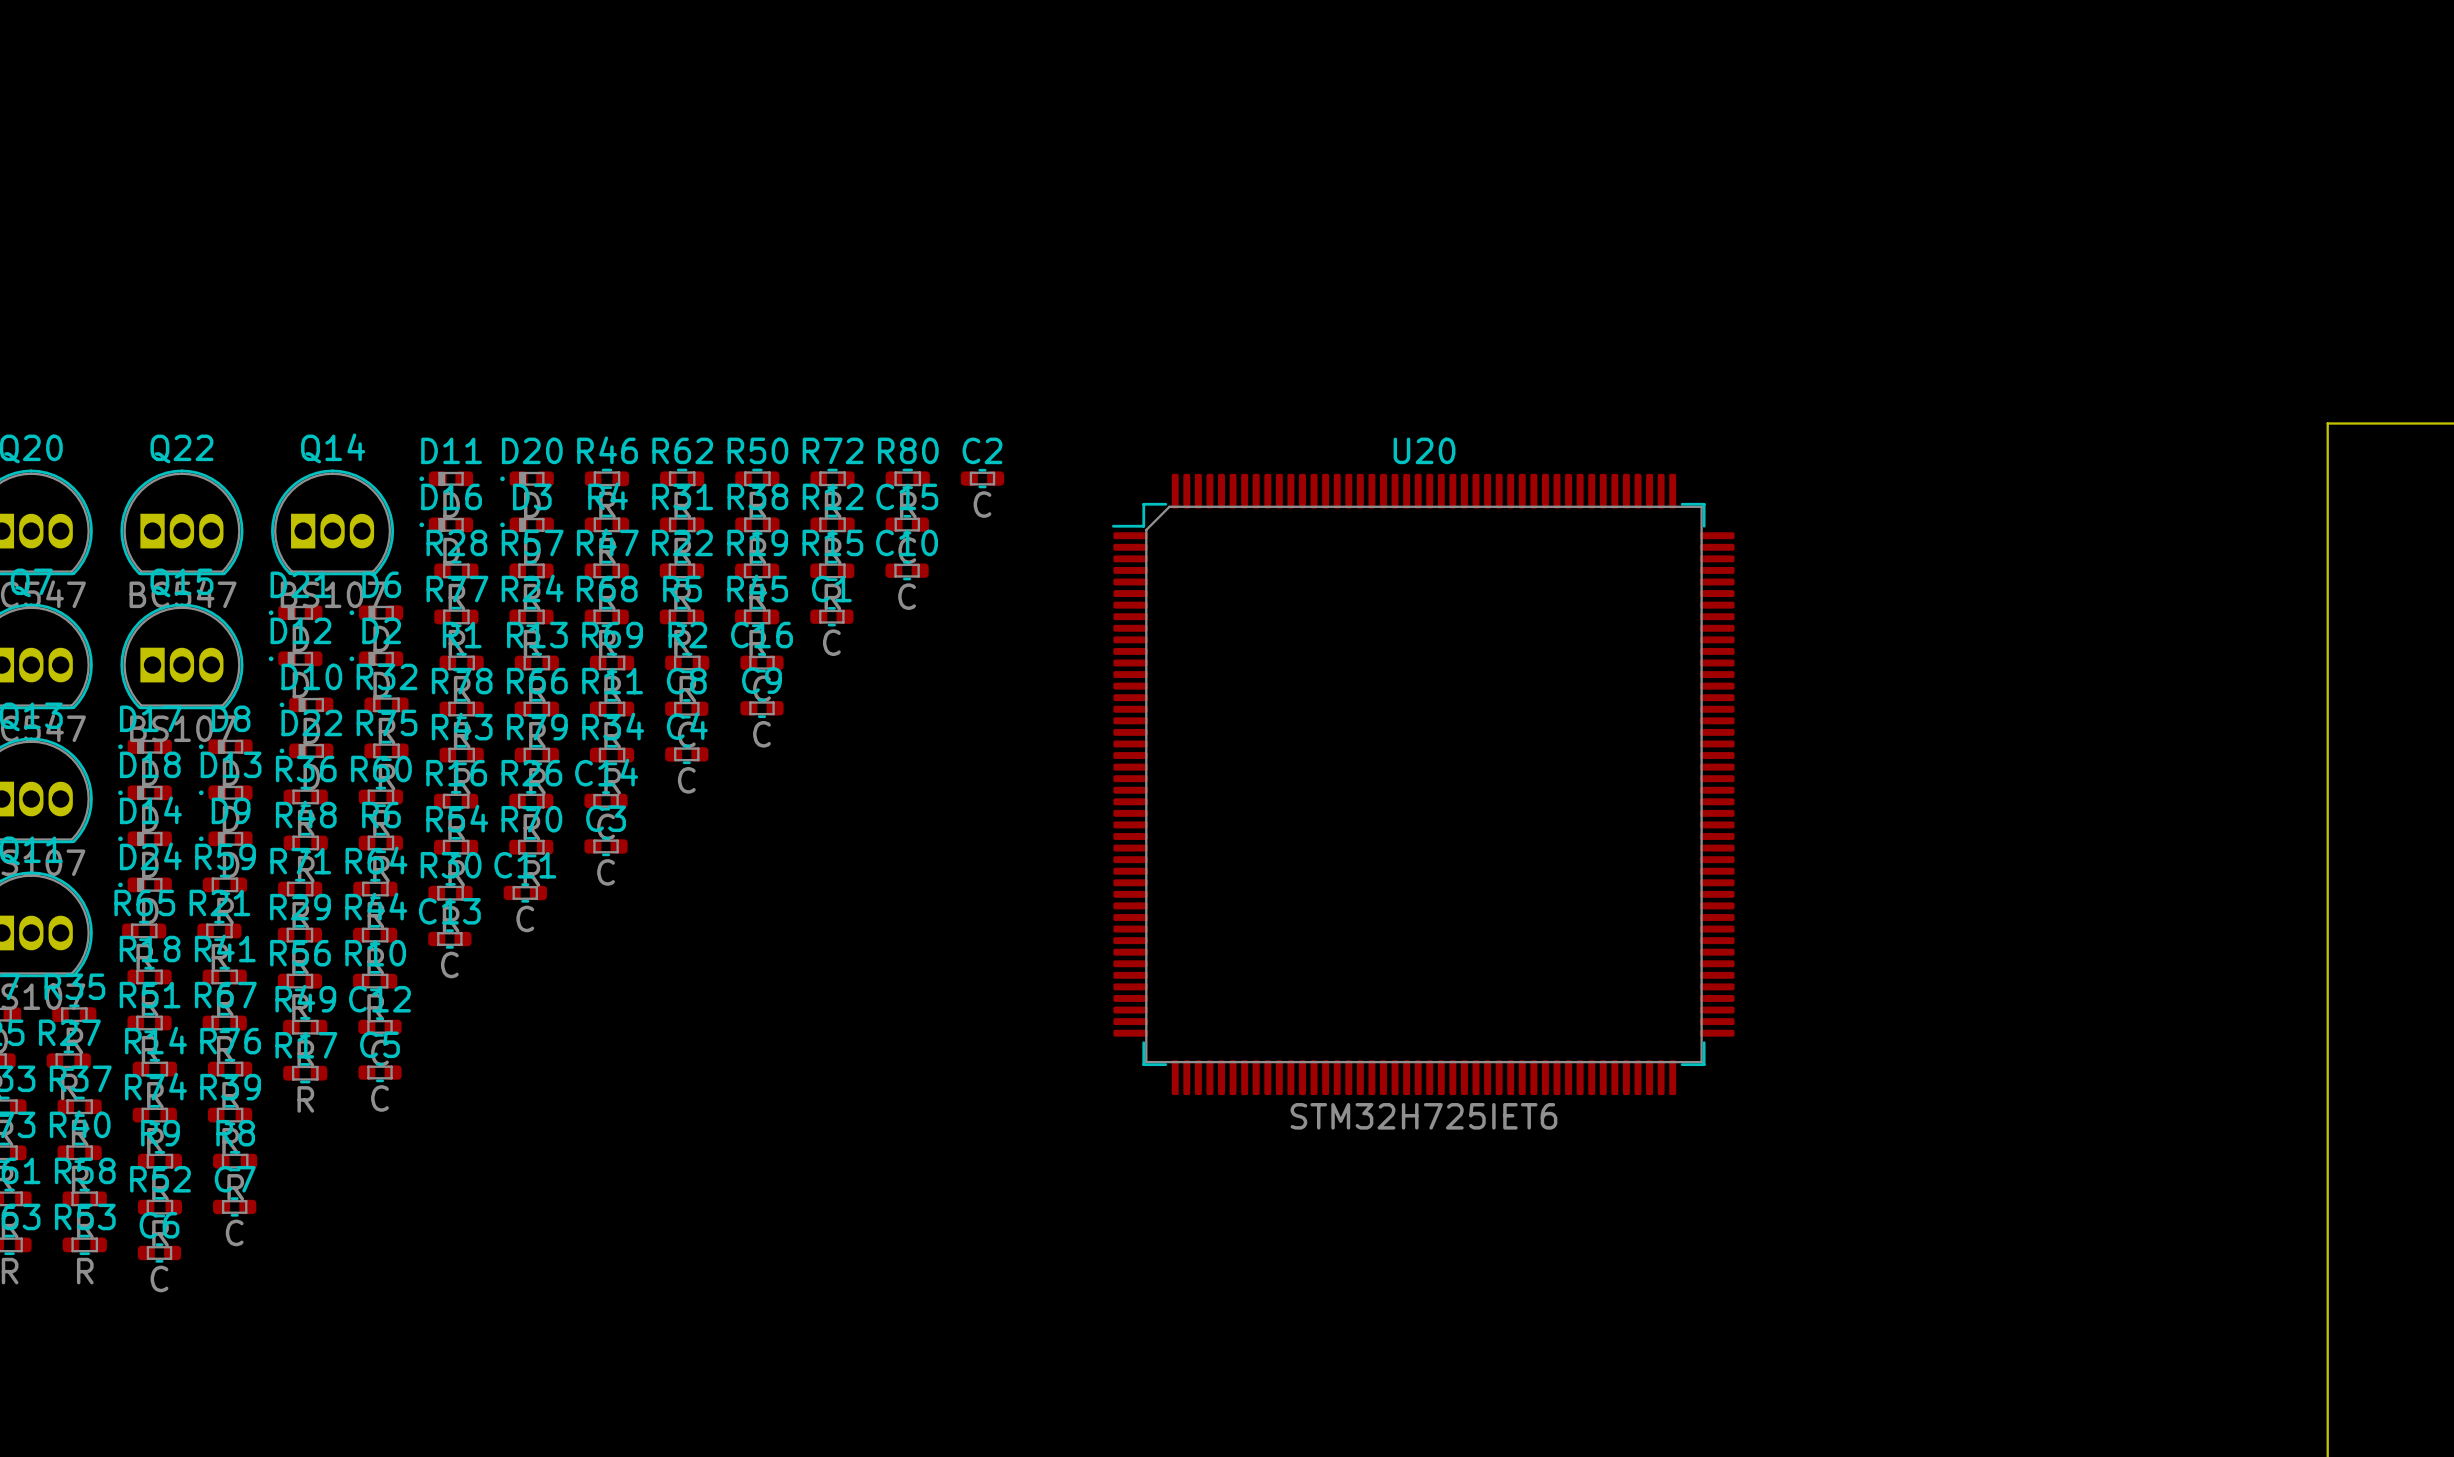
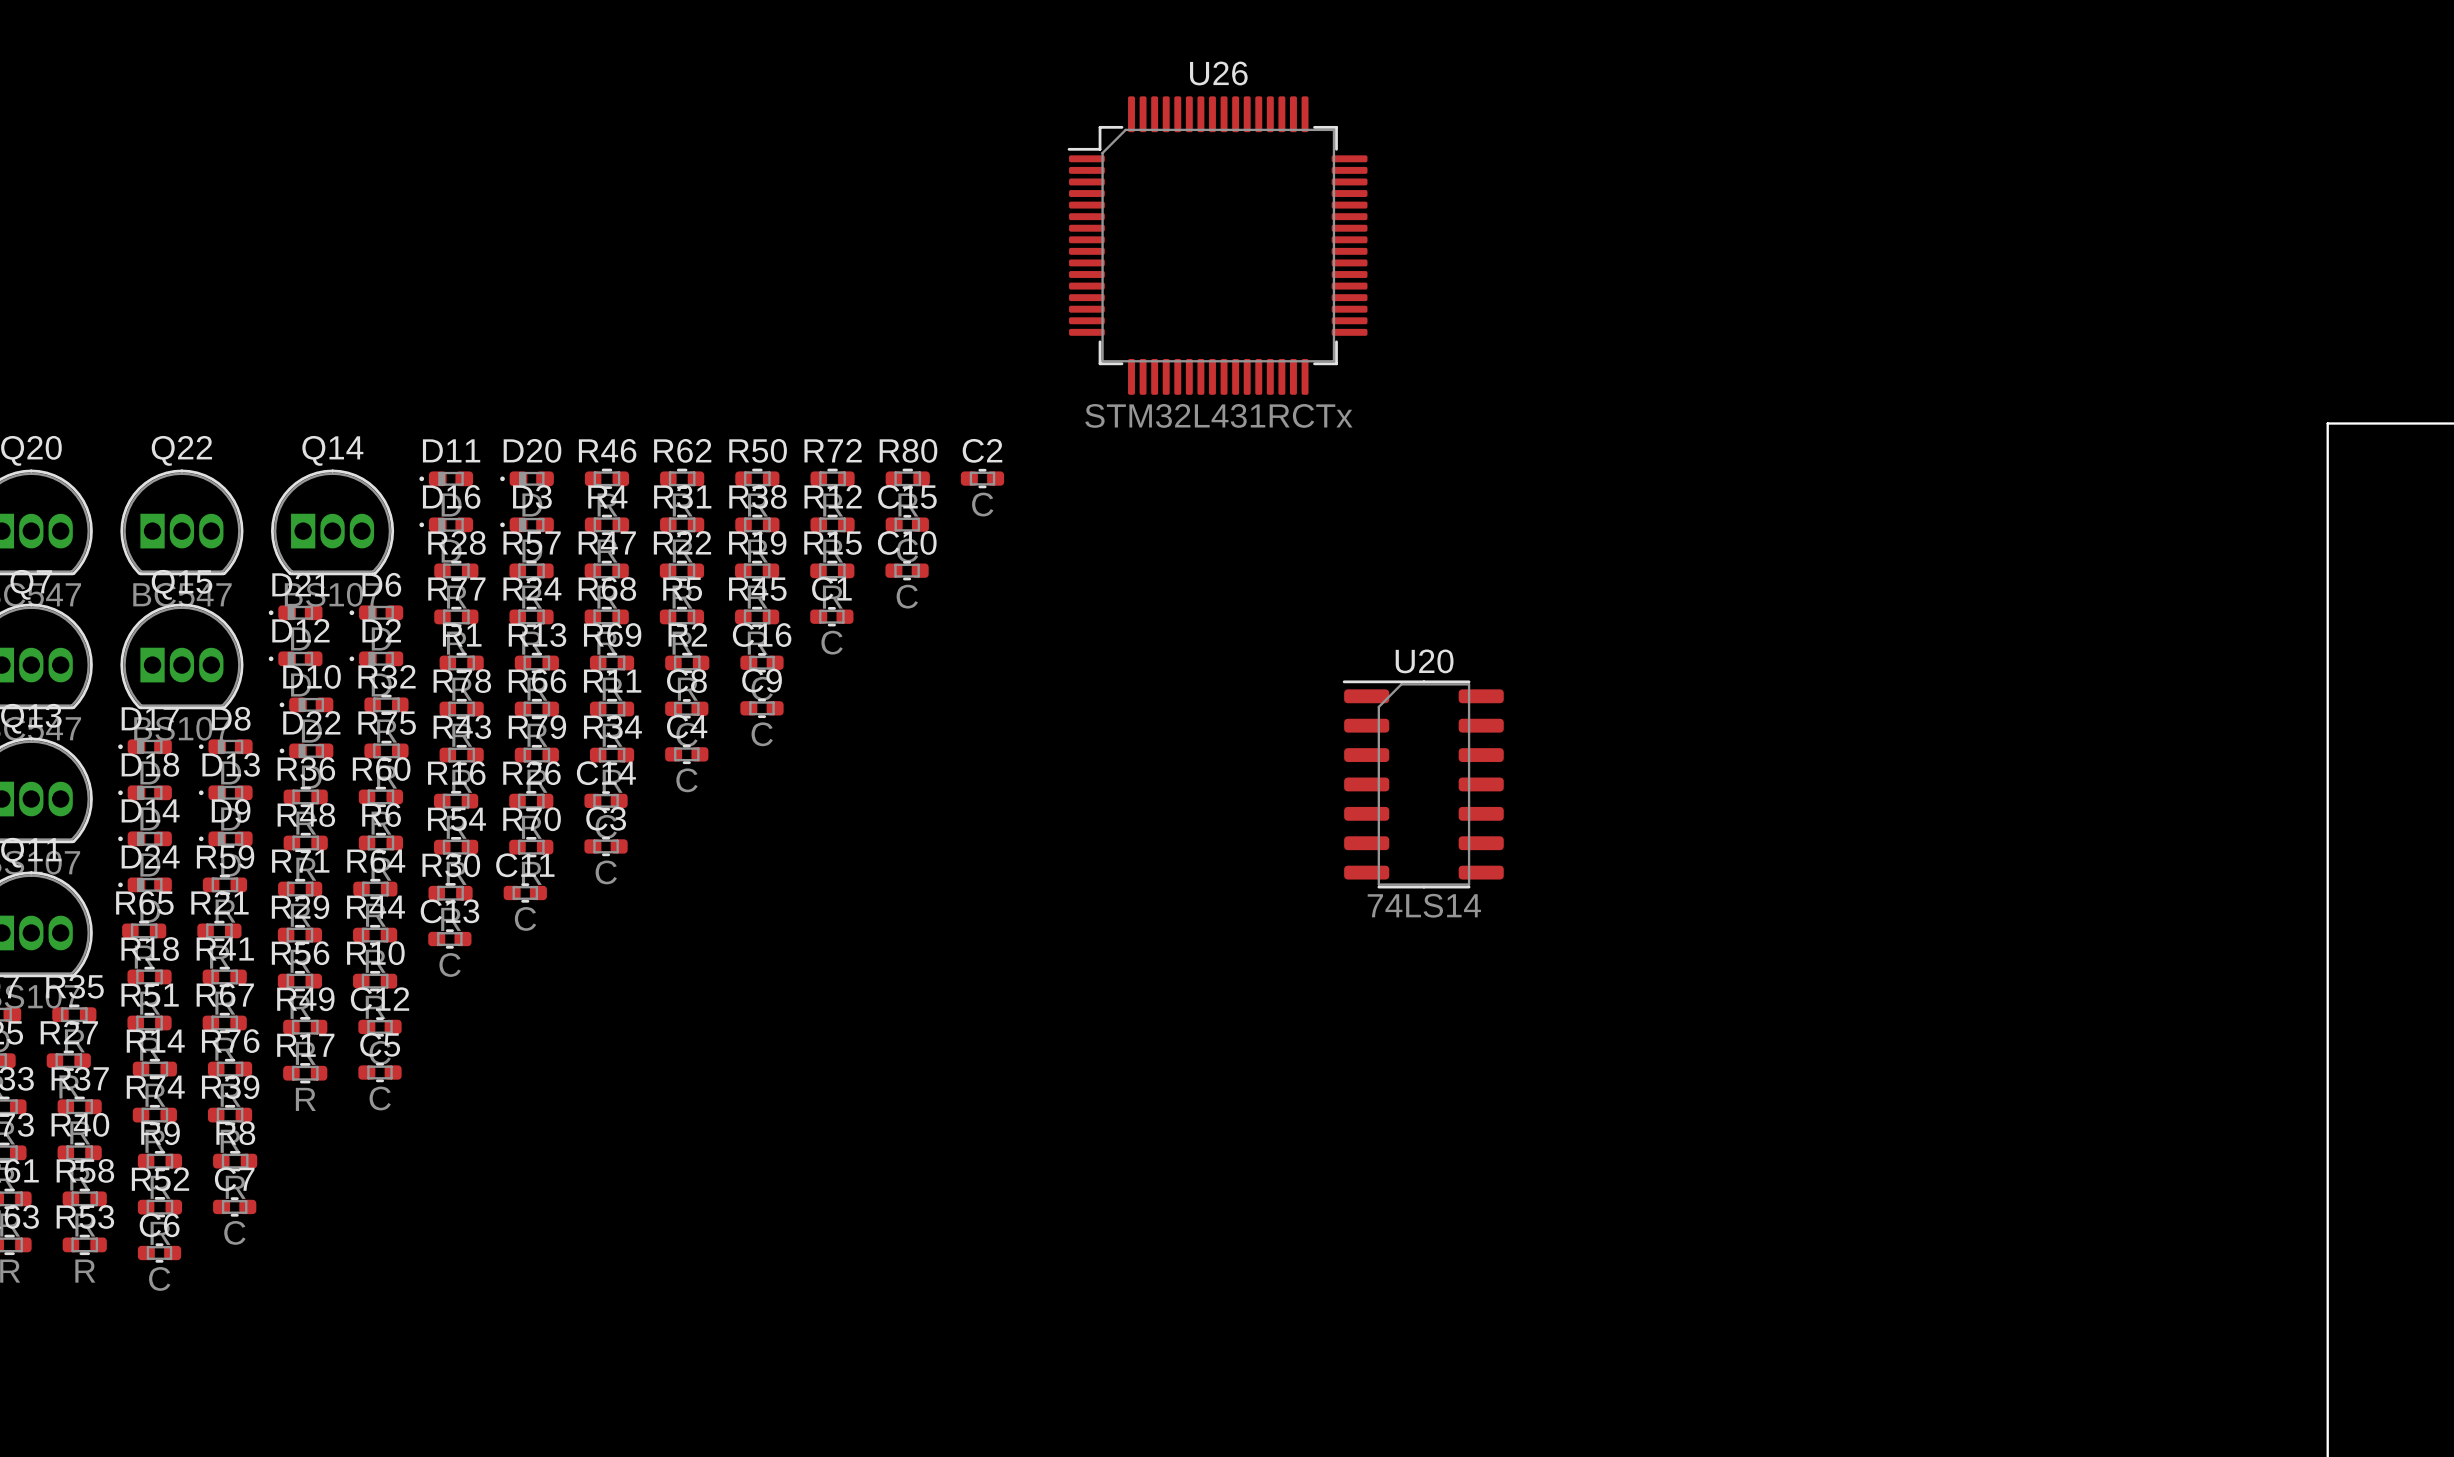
U26: none -> STM32L431RCTx (1217, 245)
U20 name position: U20 (1424, 450) -> U20 (1424, 661)
U20 footprint: [1111, 473, 1735, 1096] -> [1342, 680, 1504, 889]
U20 value: STM32H725IET6 (1423, 1116) -> 74LS14 (1424, 905)

